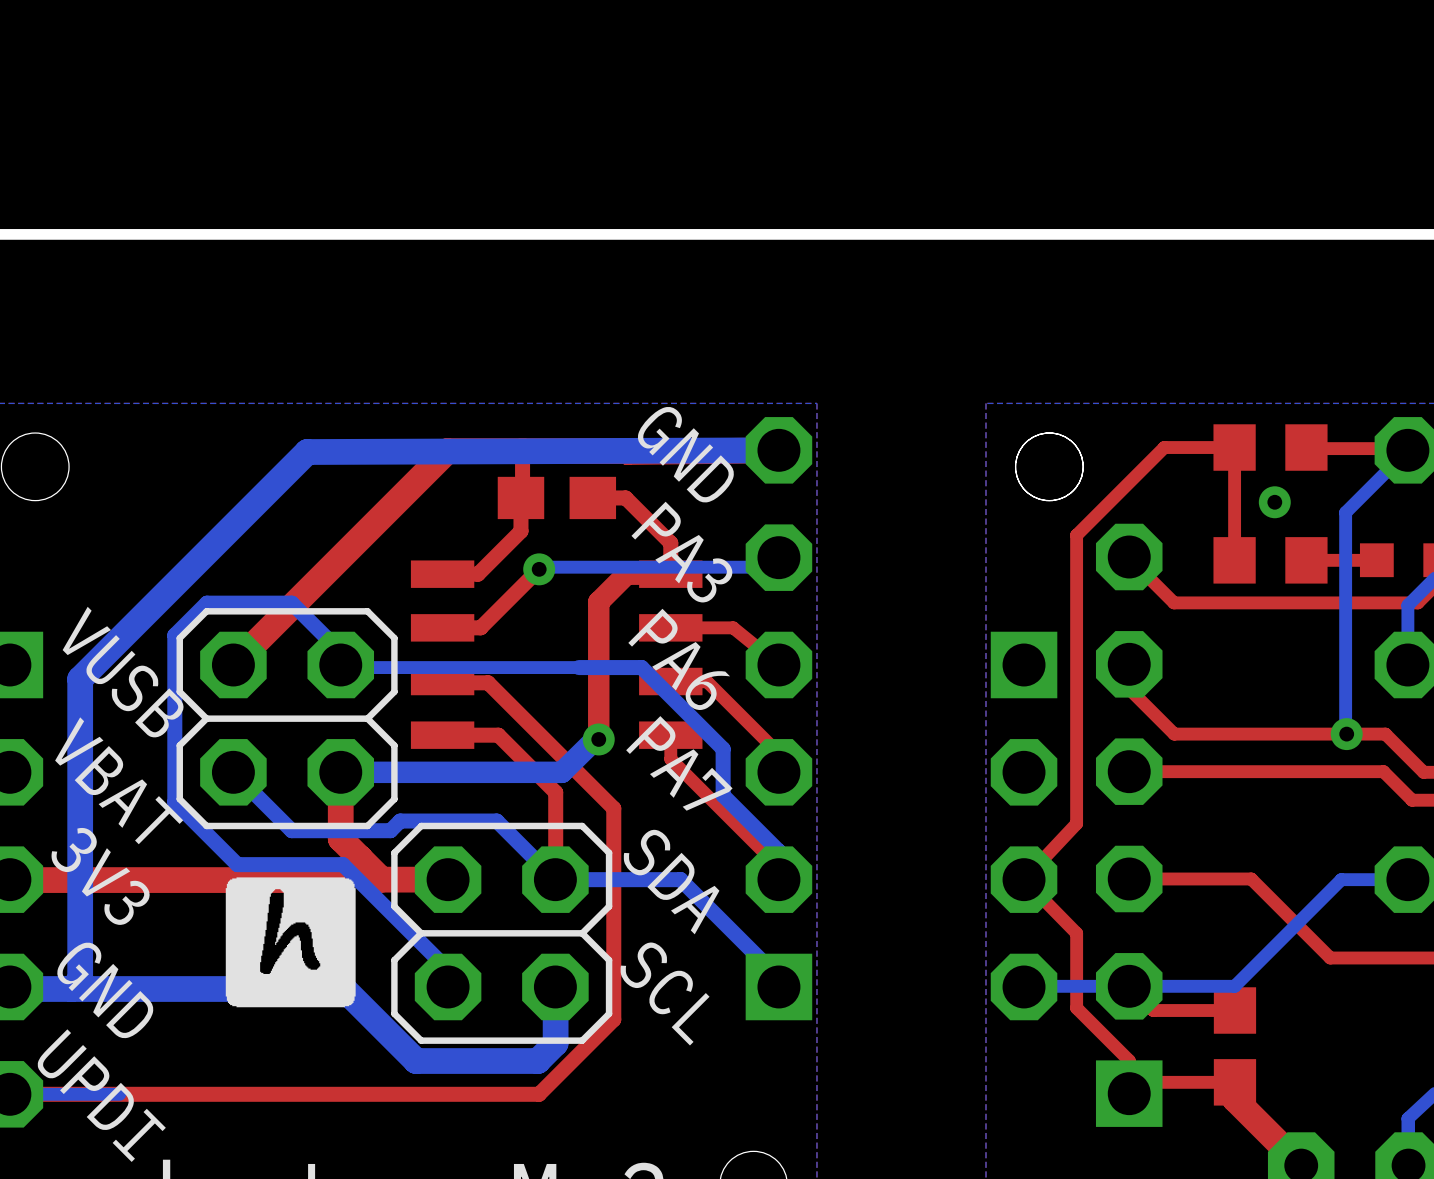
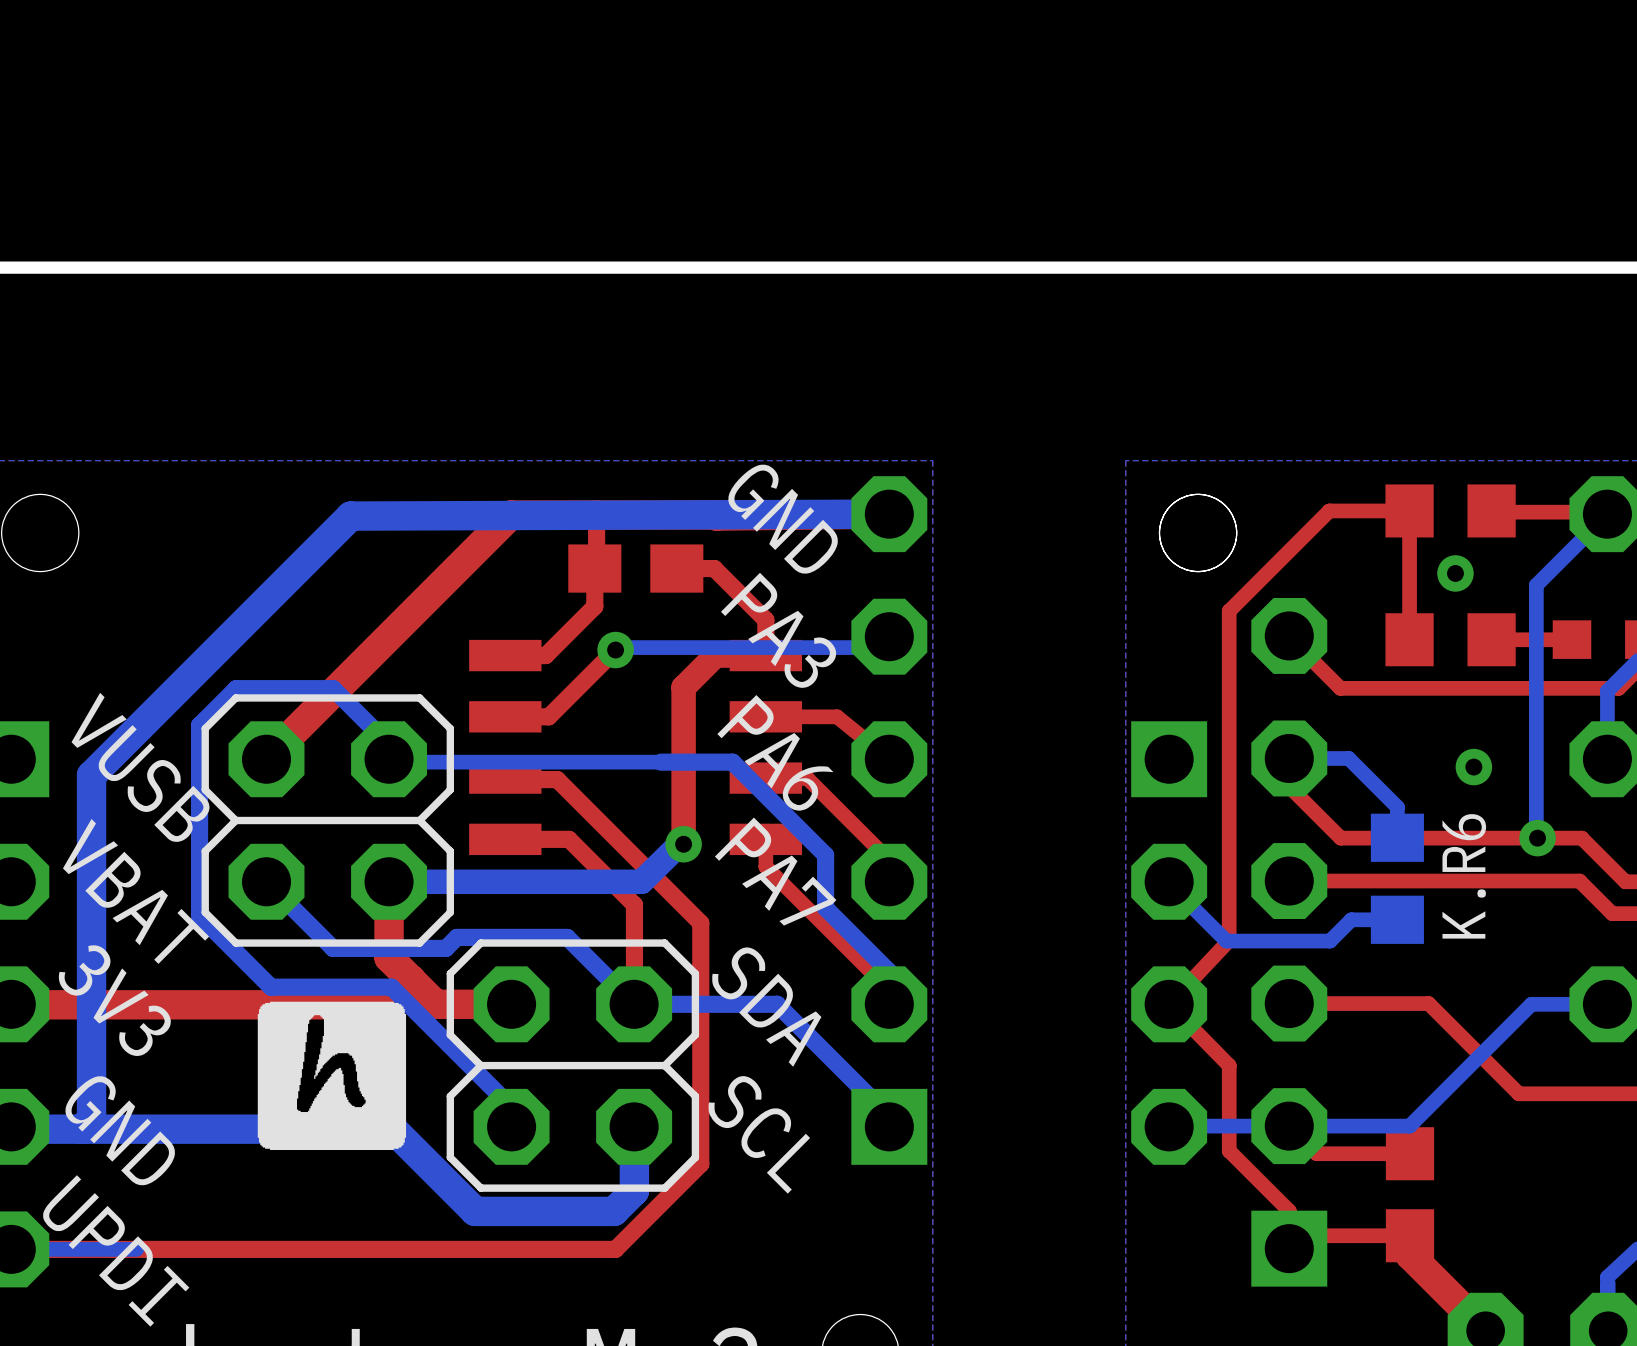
bottom track: none -> (1289, 758) (1348, 758) (1397, 807) (1397, 837)
via: none -> (1473, 767)
K.R6: none -> (1397, 878)
bottom track: none -> (1166, 881) (1226, 941) (1330, 941) (1351, 919) (1397, 919)

